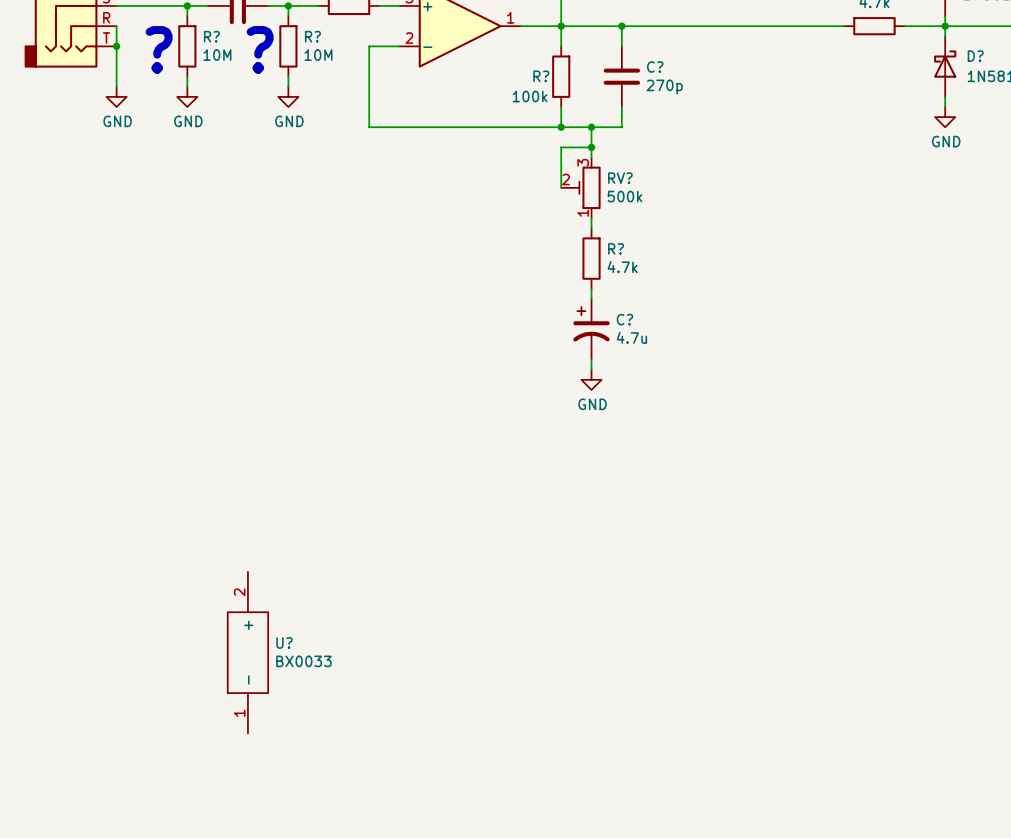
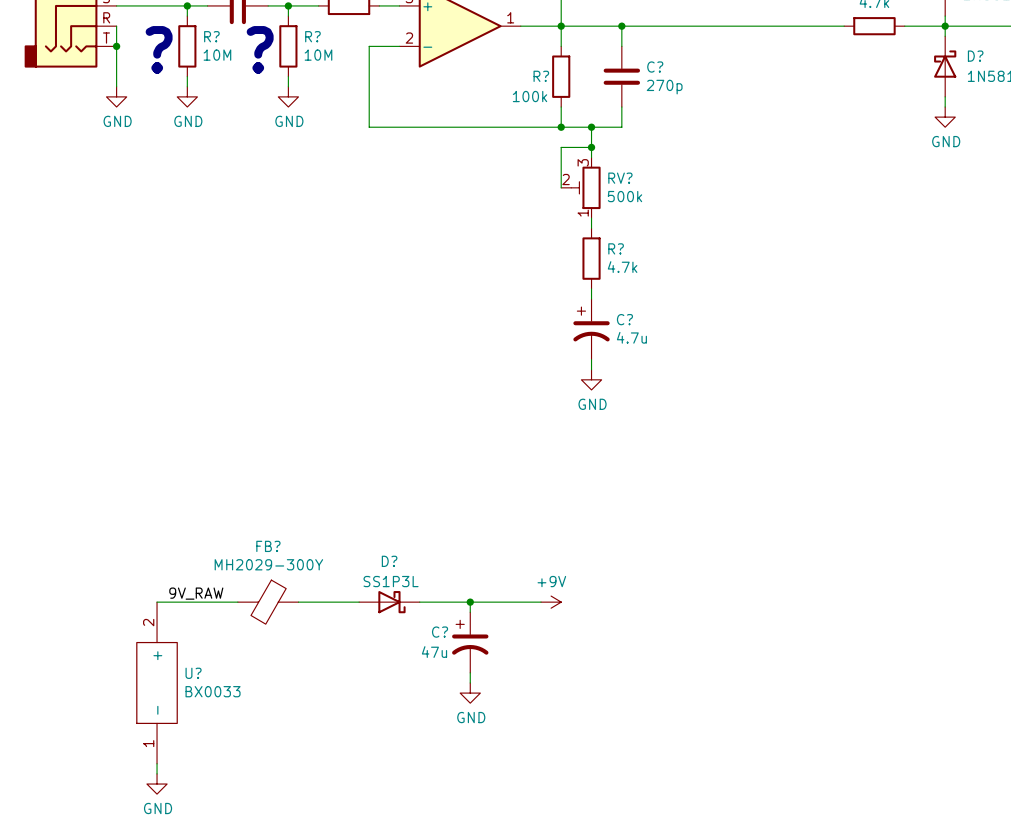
label: none -> 9V_RAW (196, 593)
wire: none -> (157, 602) (237, 602)
FB?: none -> MH2029-300Y (268, 602)
wire: none -> (298, 602) (359, 602)
D?: none -> SS1P3L (389, 602)
wire: none -> (419, 602) (541, 602)
wire: none -> (470, 602) (470, 612)
junction: none -> (470, 602)
power symbol: none -> +9V (551, 602)
C?: none -> 47u (470, 642)
U? position: (247, 652) -> (157, 682)
wire: none -> (470, 672) (470, 682)
power symbol: none -> GND (470, 693)
wire: none -> (157, 763) (157, 773)
power symbol: none -> GND (157, 784)

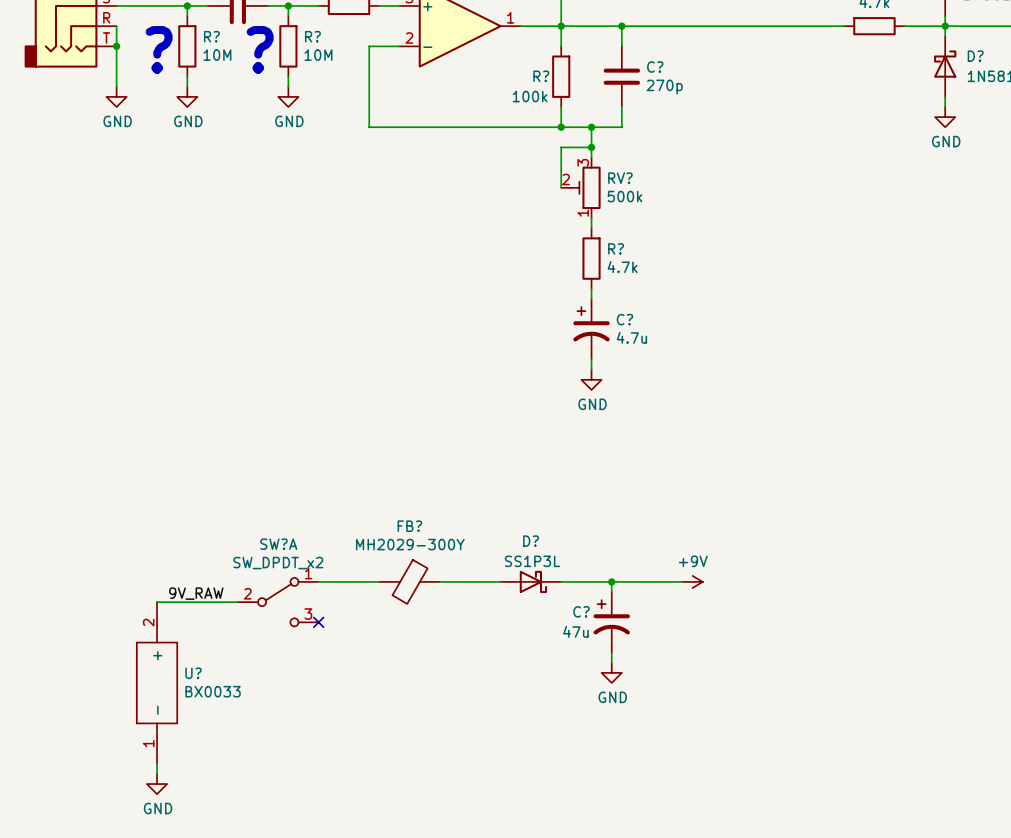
wire: none -> (318, 581) (379, 581)
junction: none -> (611, 581)
FB? position: (268, 602) -> (409, 581)
SW?A: none -> SW_DPDT_x2 (278, 602)
wire: (298, 602) (359, 602) -> (439, 581) (500, 581)
D? position: (389, 602) -> (530, 581)
wire: (419, 602) (541, 602) -> (561, 581) (682, 581)
wire: (470, 602) (470, 612) -> (611, 581) (611, 592)
junction: (470, 602) -> none
power symbol position: +9V (551, 602) -> +9V (692, 581)
no-connect mark: none -> (318, 622)
C? position: (470, 642) -> (611, 622)
wire: (470, 672) (470, 682) -> (611, 652) (611, 662)
power symbol position: GND (470, 693) -> GND (611, 672)

